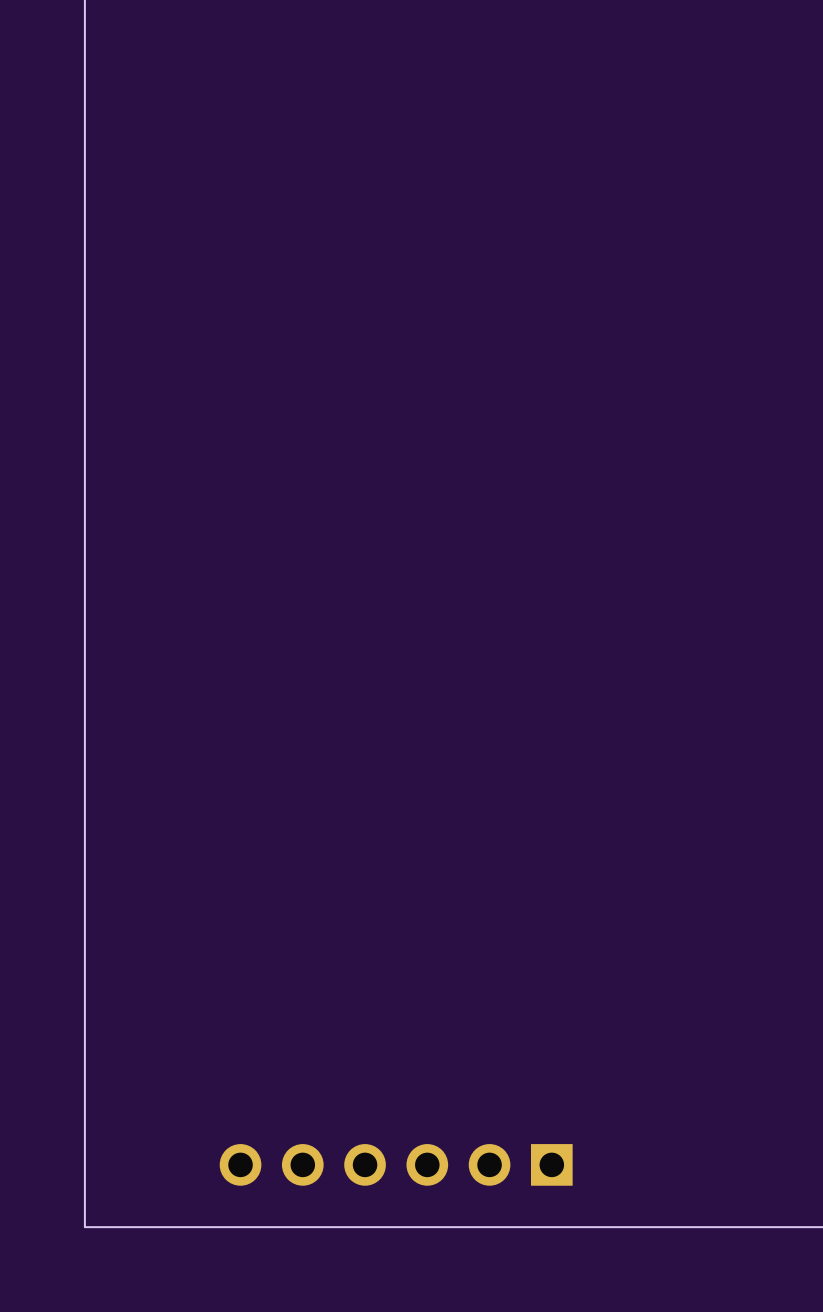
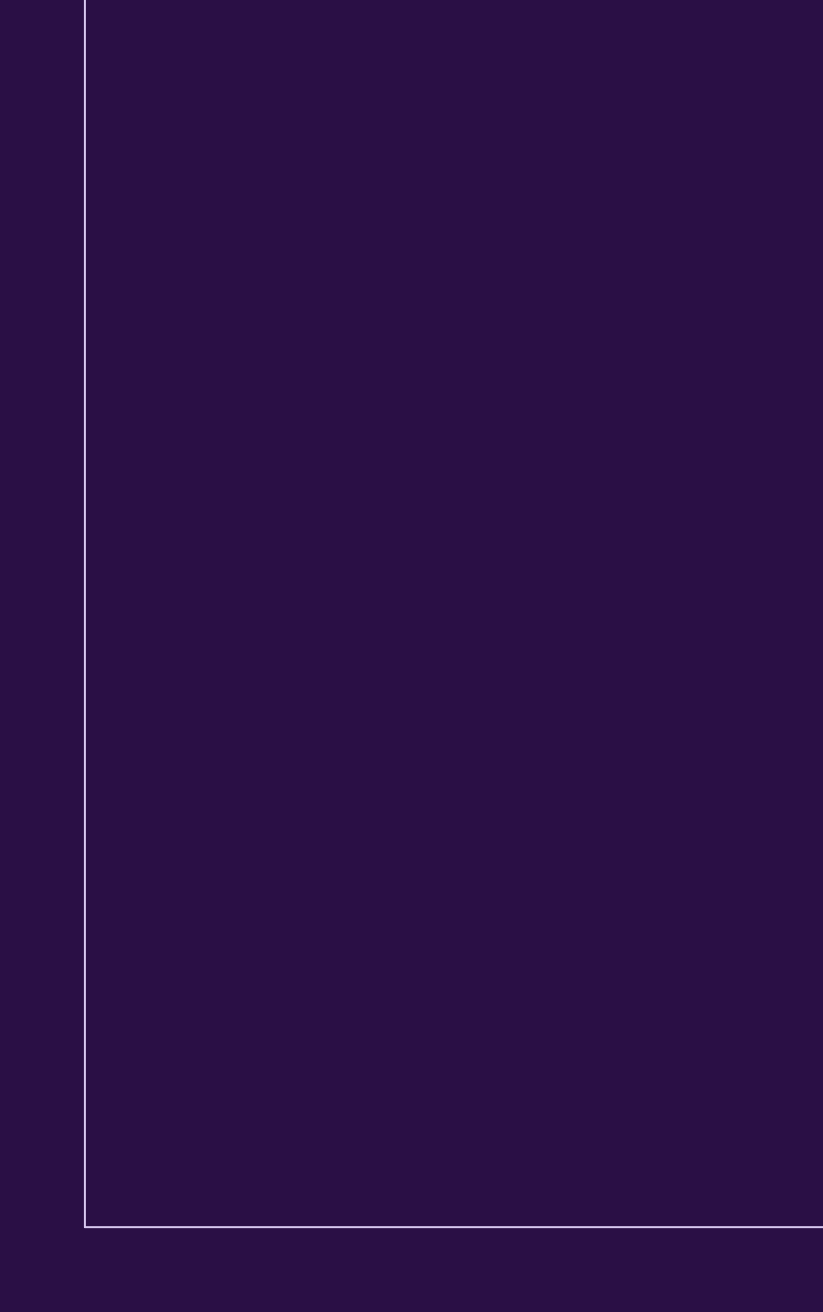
part: (396, 1164) -> none

